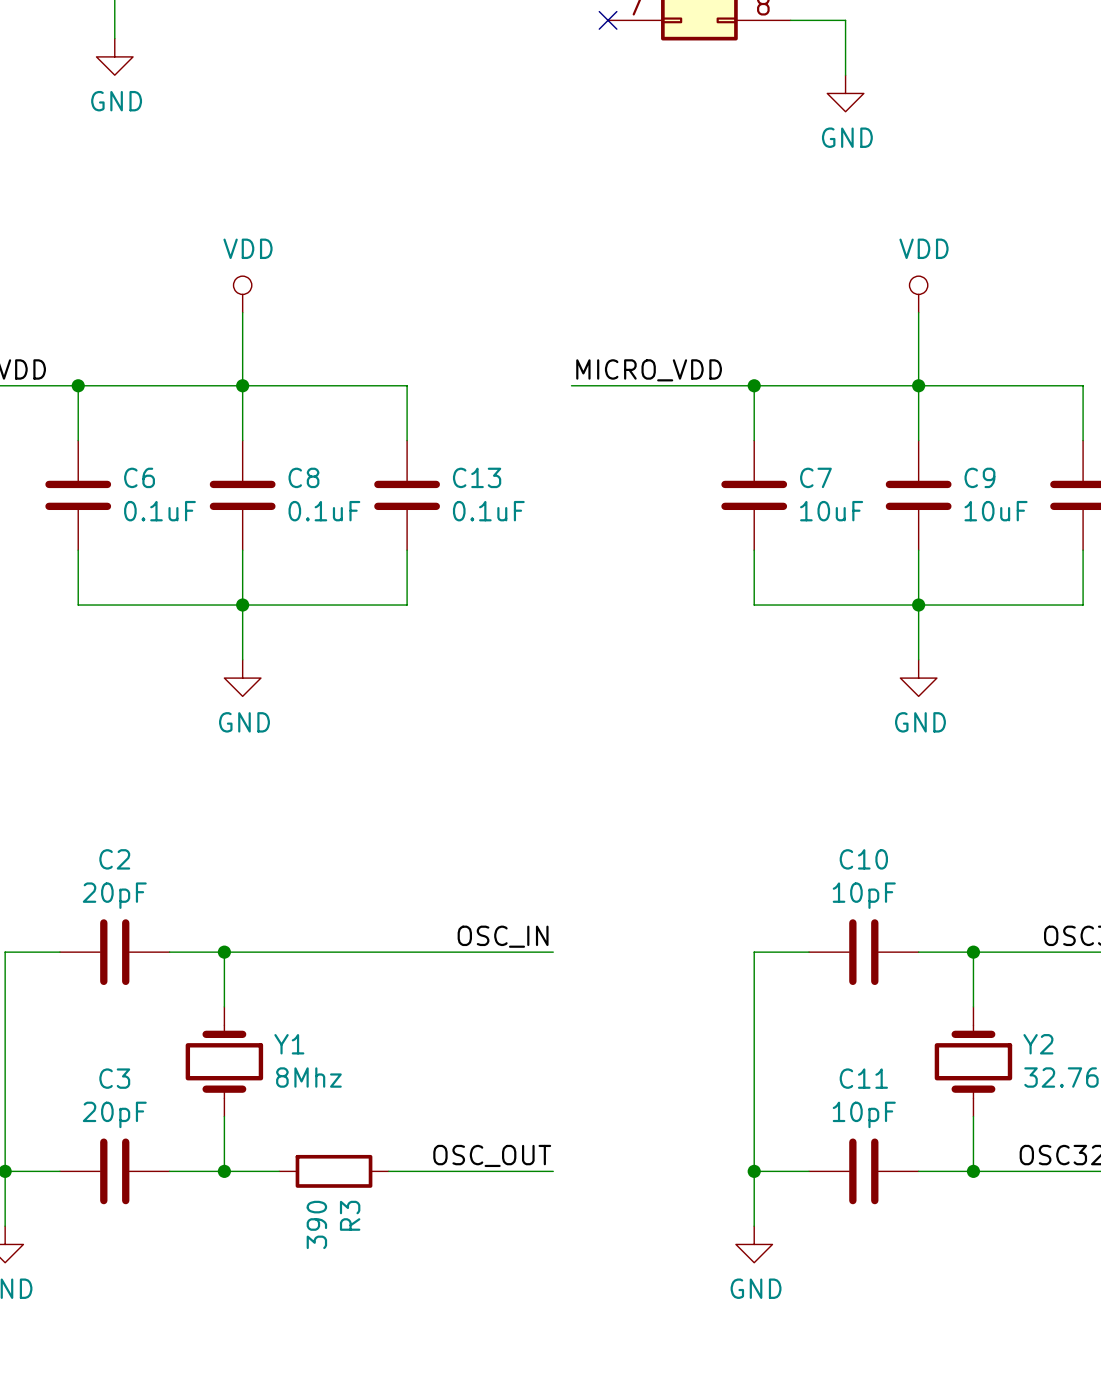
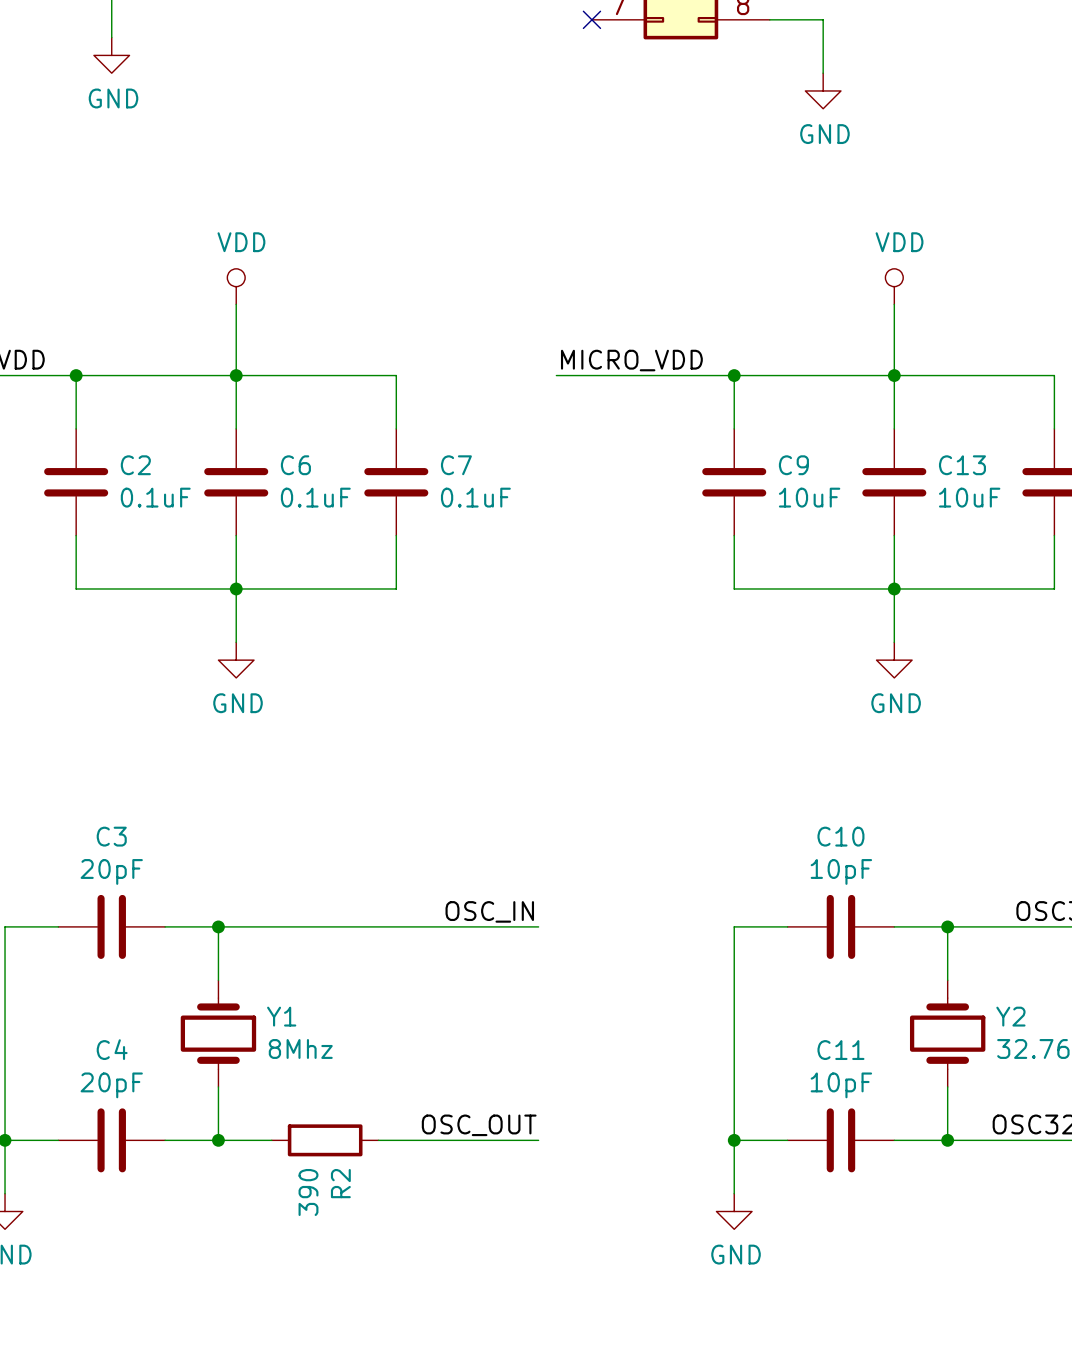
C6 name: C6 (139, 477) -> C2 (135, 465)
C8 name: C8 (303, 477) -> C6 (295, 465)
C13 name: C13 (477, 477) -> C7 (456, 465)
C7 name: C7 (815, 477) -> C9 (793, 465)
C9 name: C9 (979, 477) -> C13 (962, 465)
C2 name: C2 (114, 859) -> C3 (111, 836)
C3 name: C3 (114, 1078) -> C4 (112, 1049)
R3 name: R3 (350, 1215) -> R2 (340, 1183)

